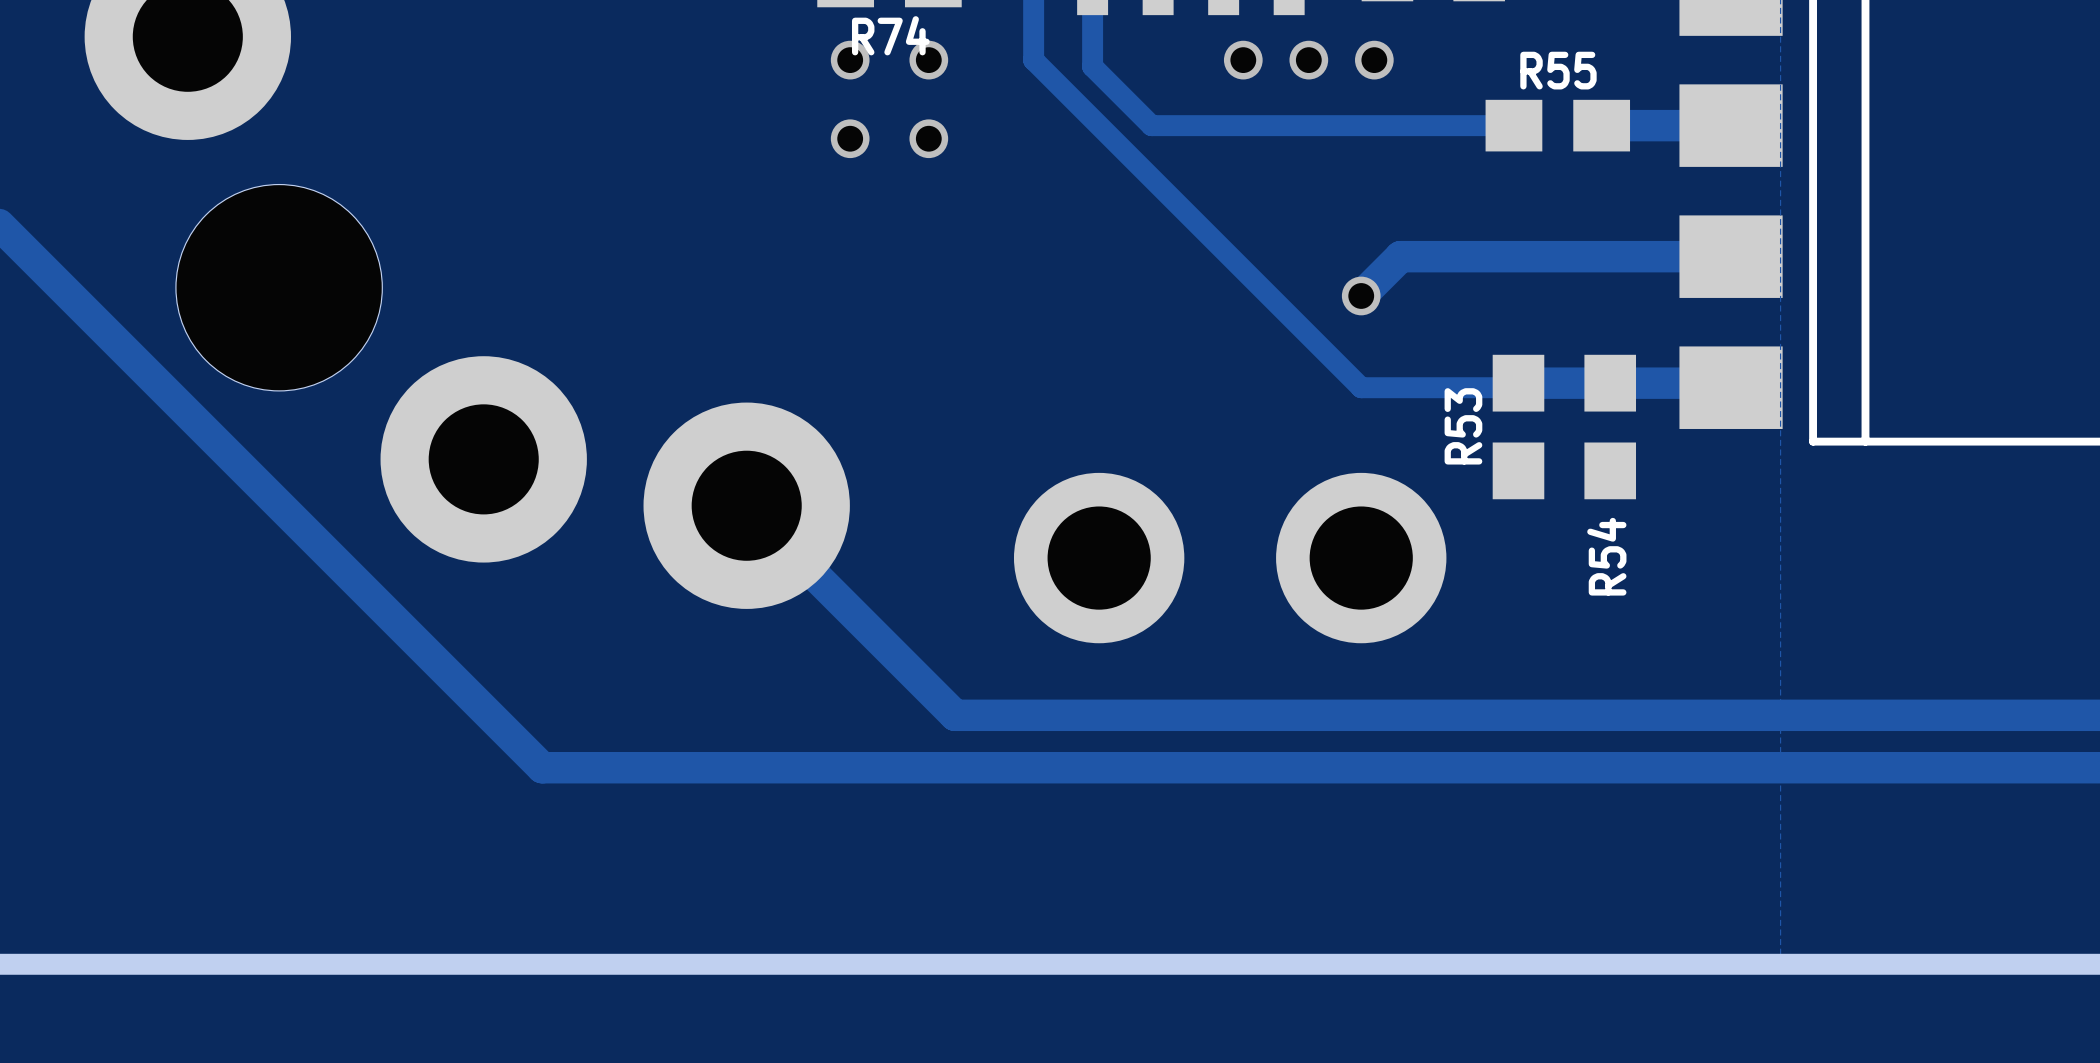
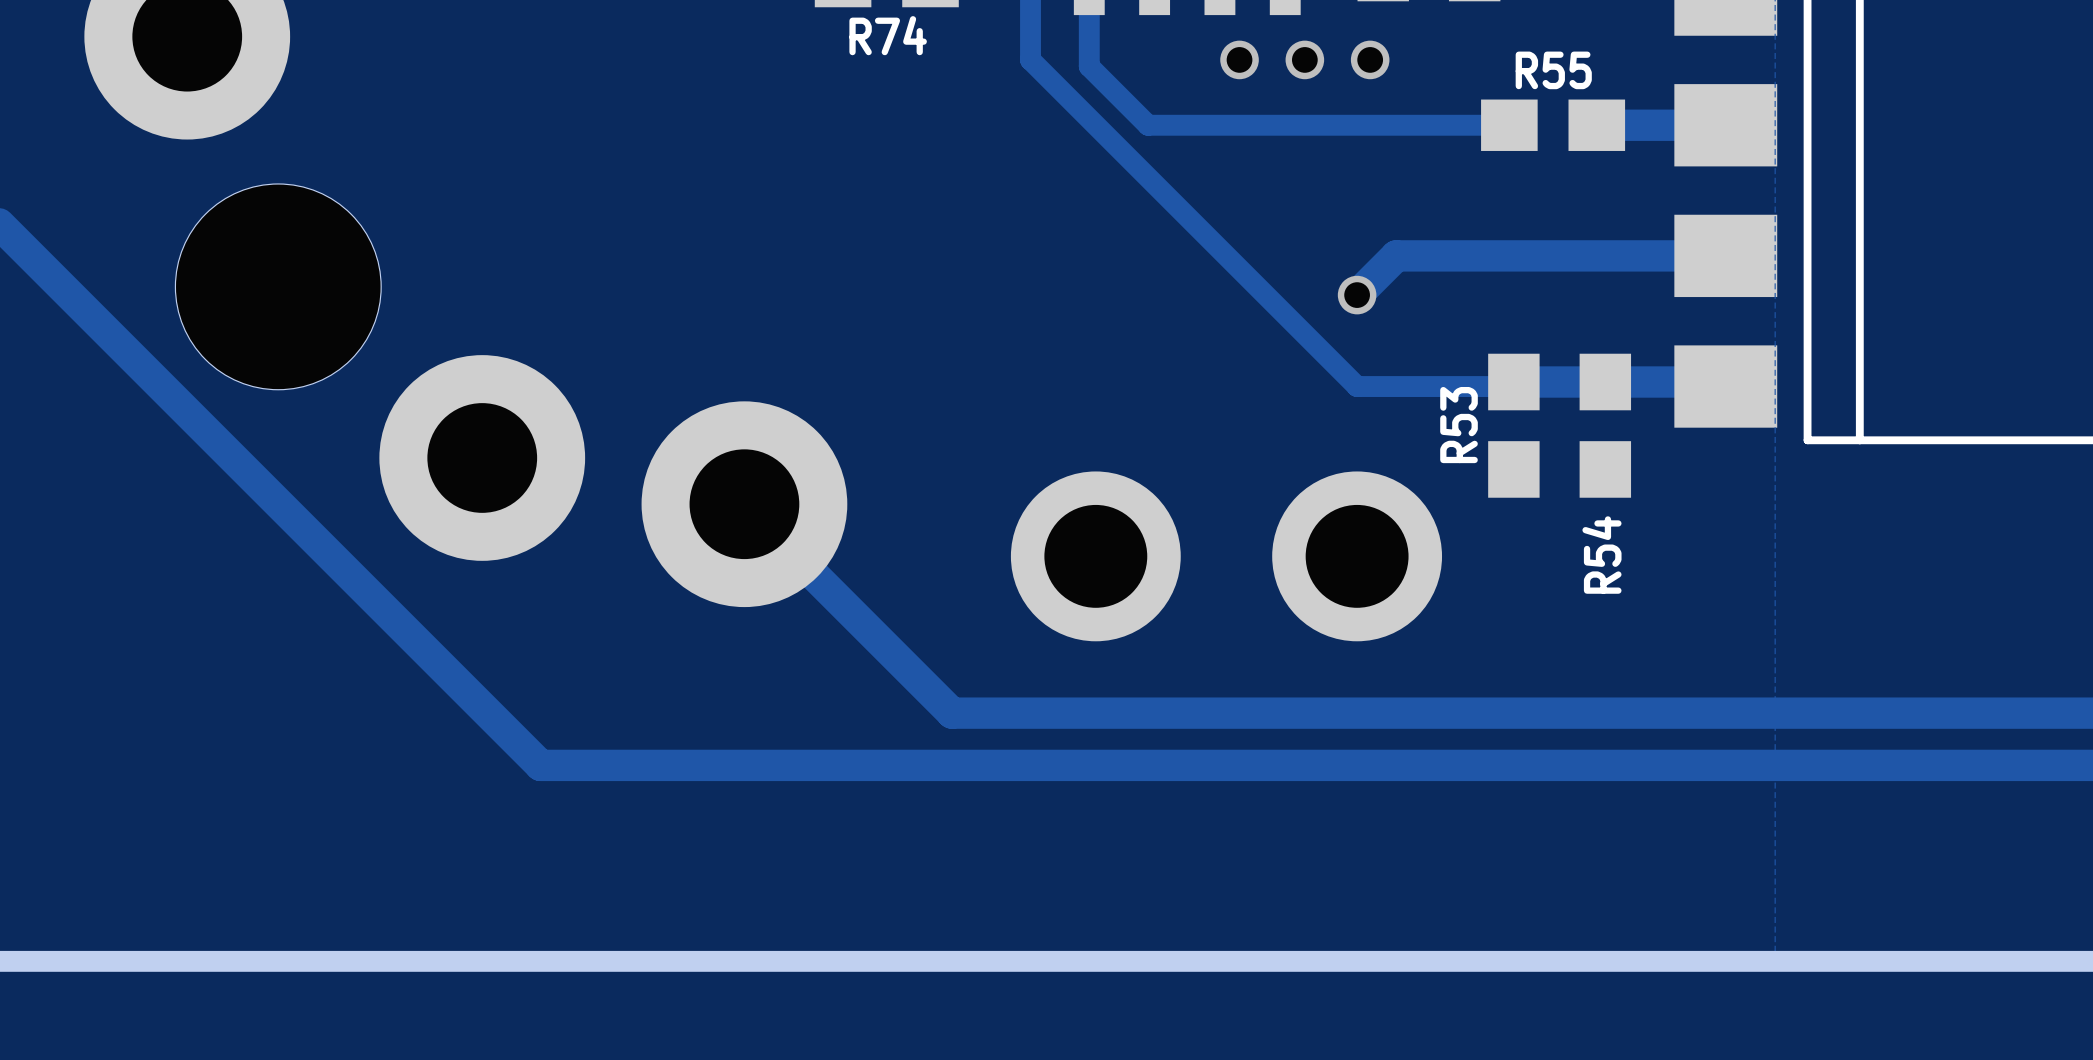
via: (850, 60) -> none
via: (928, 60) -> none
via: (850, 138) -> none
via: (928, 138) -> none

